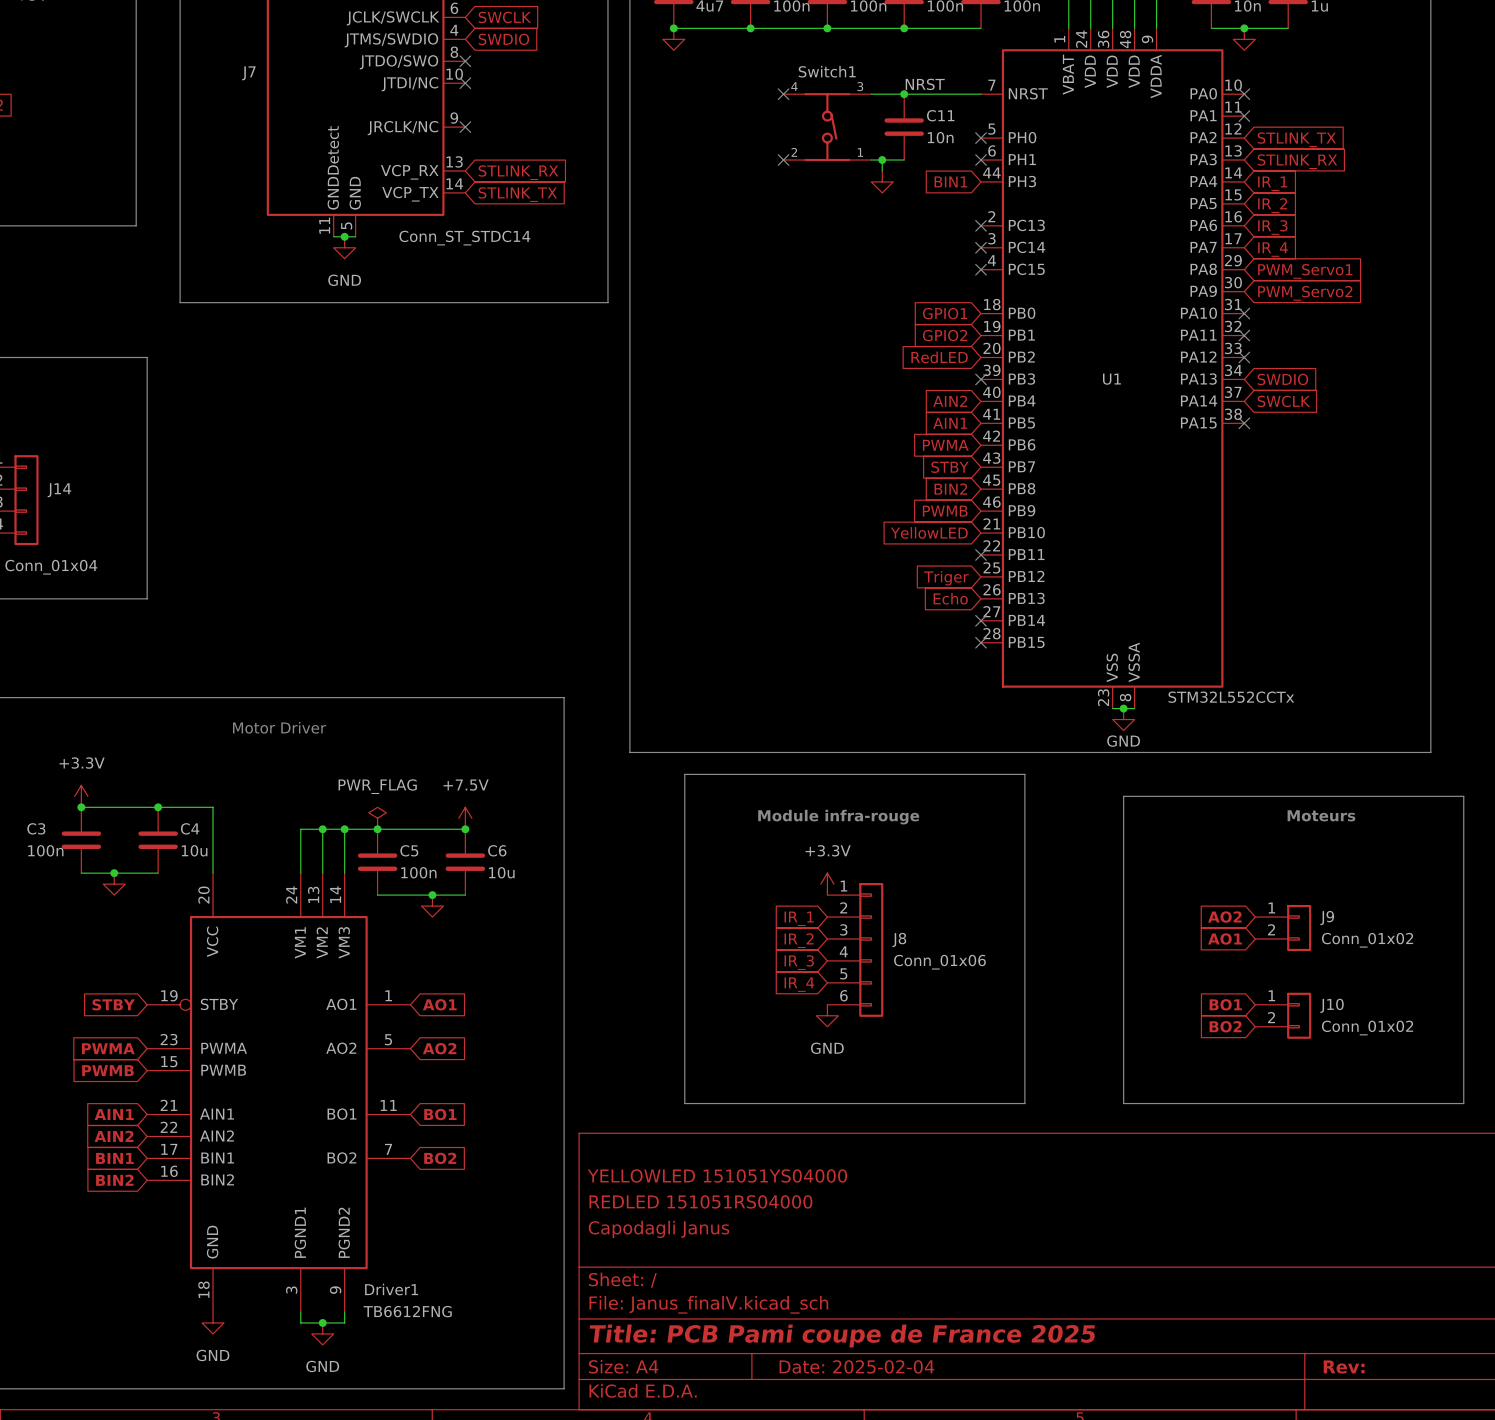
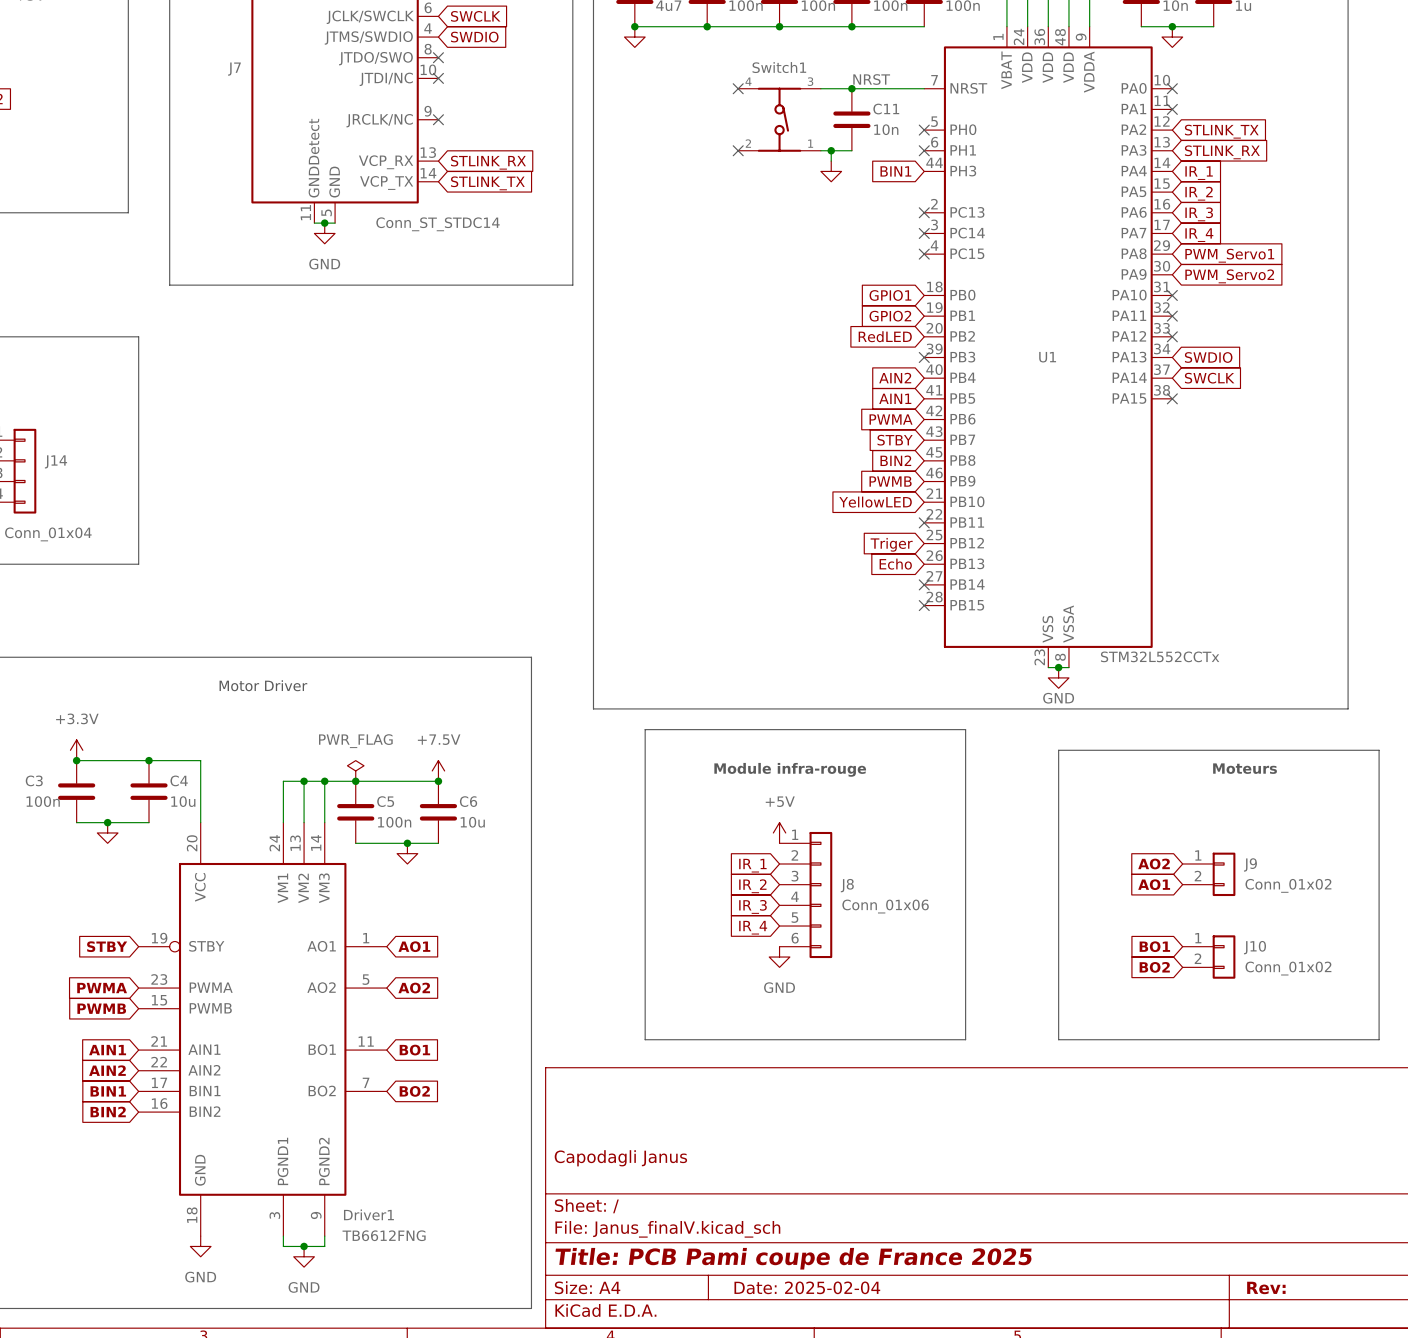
power symbol: +3.3V (827, 884) -> +5V (779, 832)
title block: YELLOWLED 151051YS04000 (717, 1175) -> none
title block: REDLED 151051RS04000 (700, 1201) -> none

